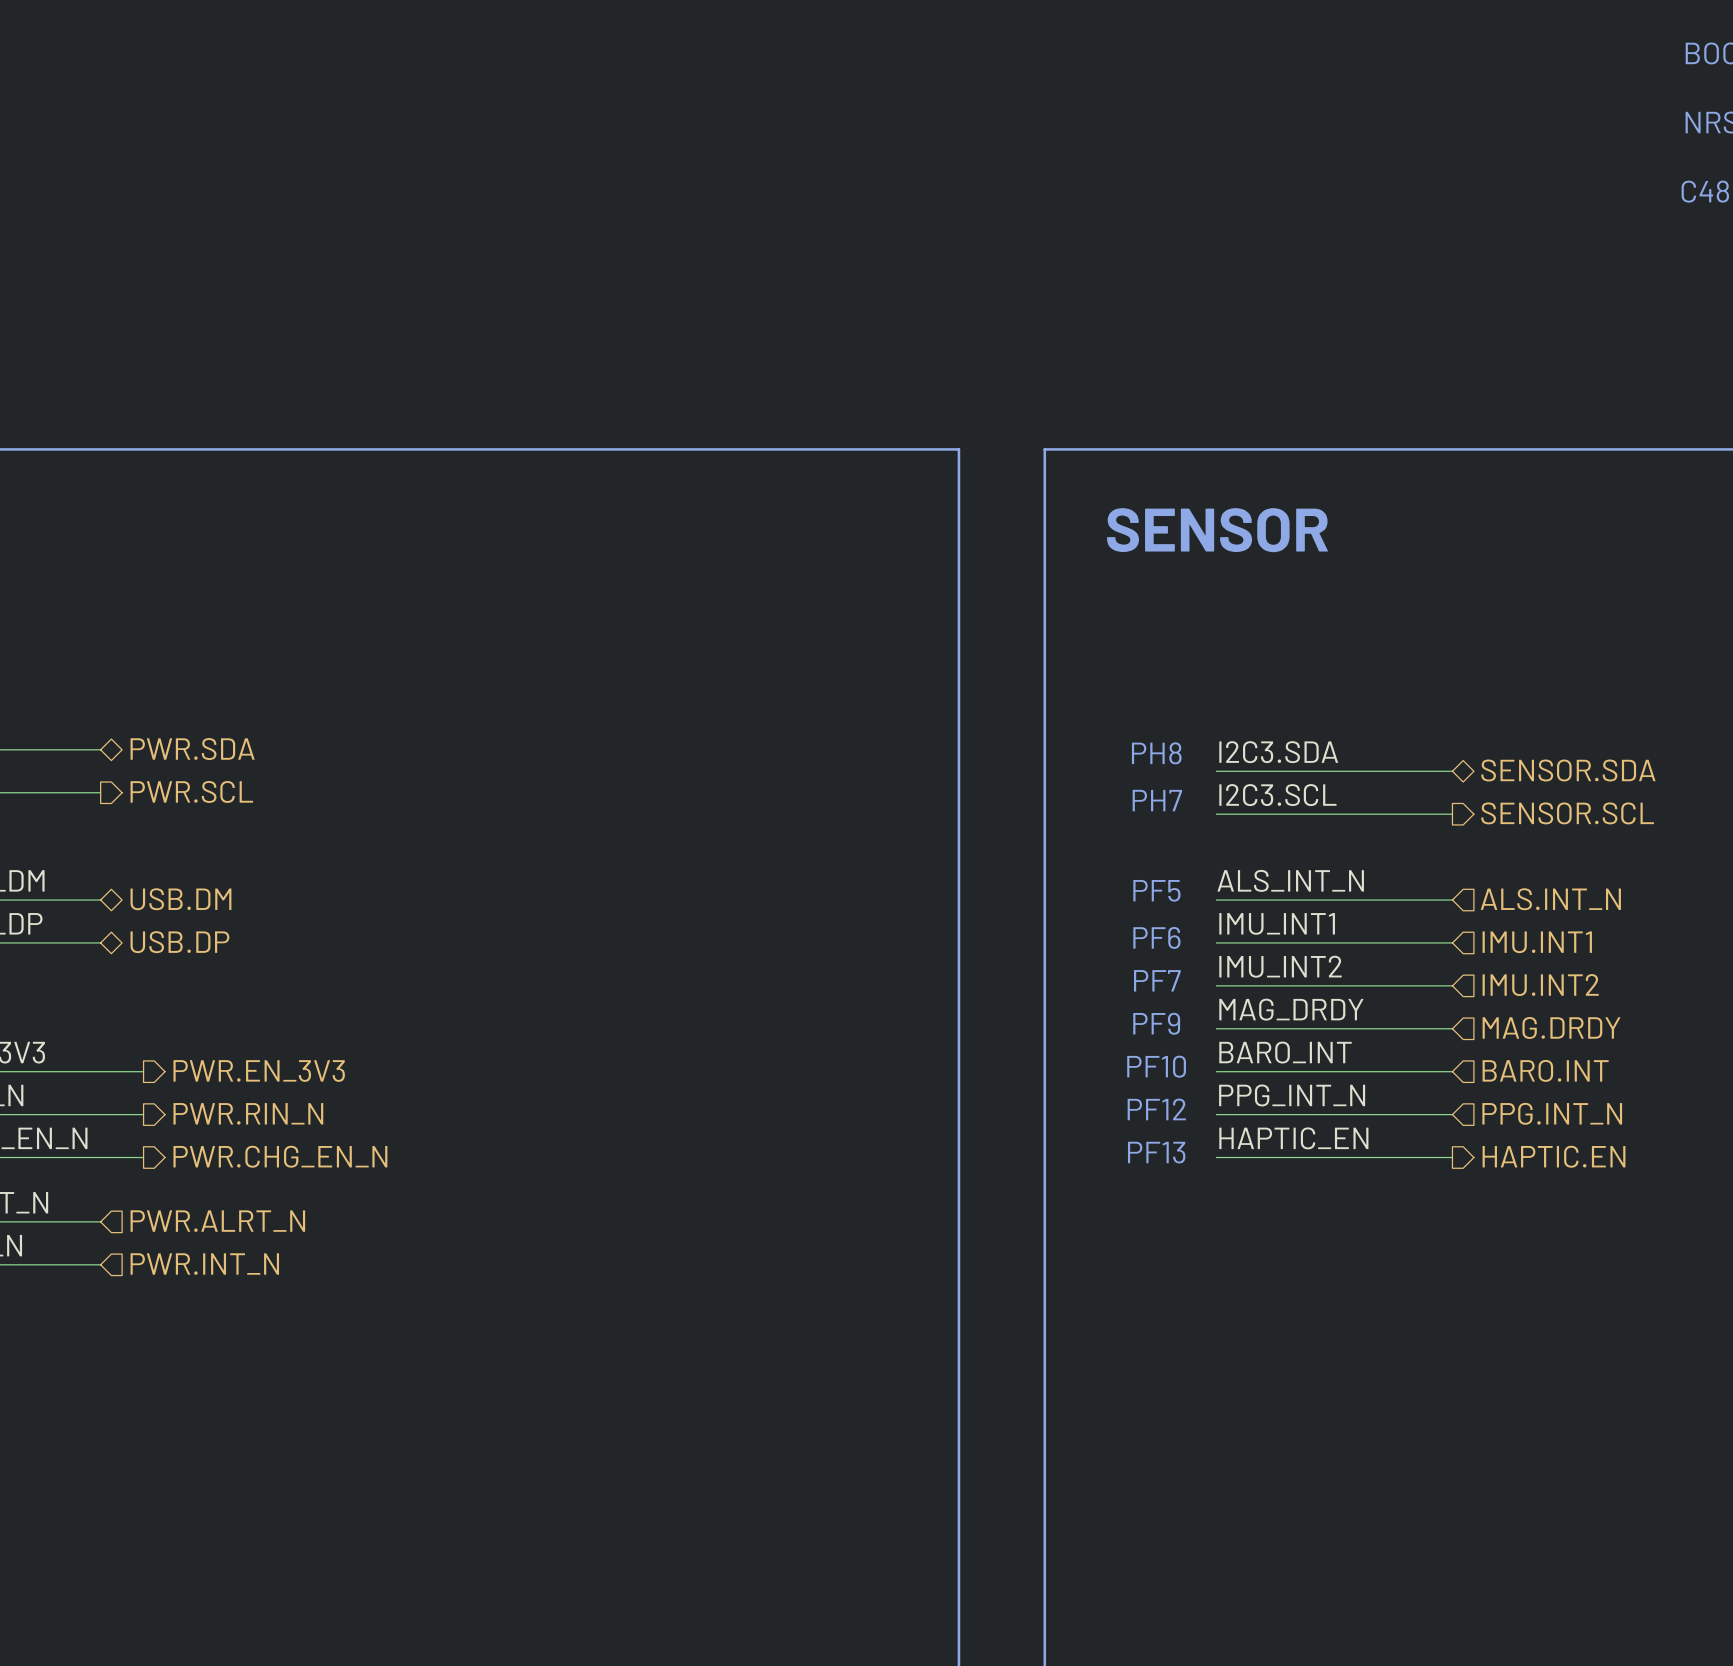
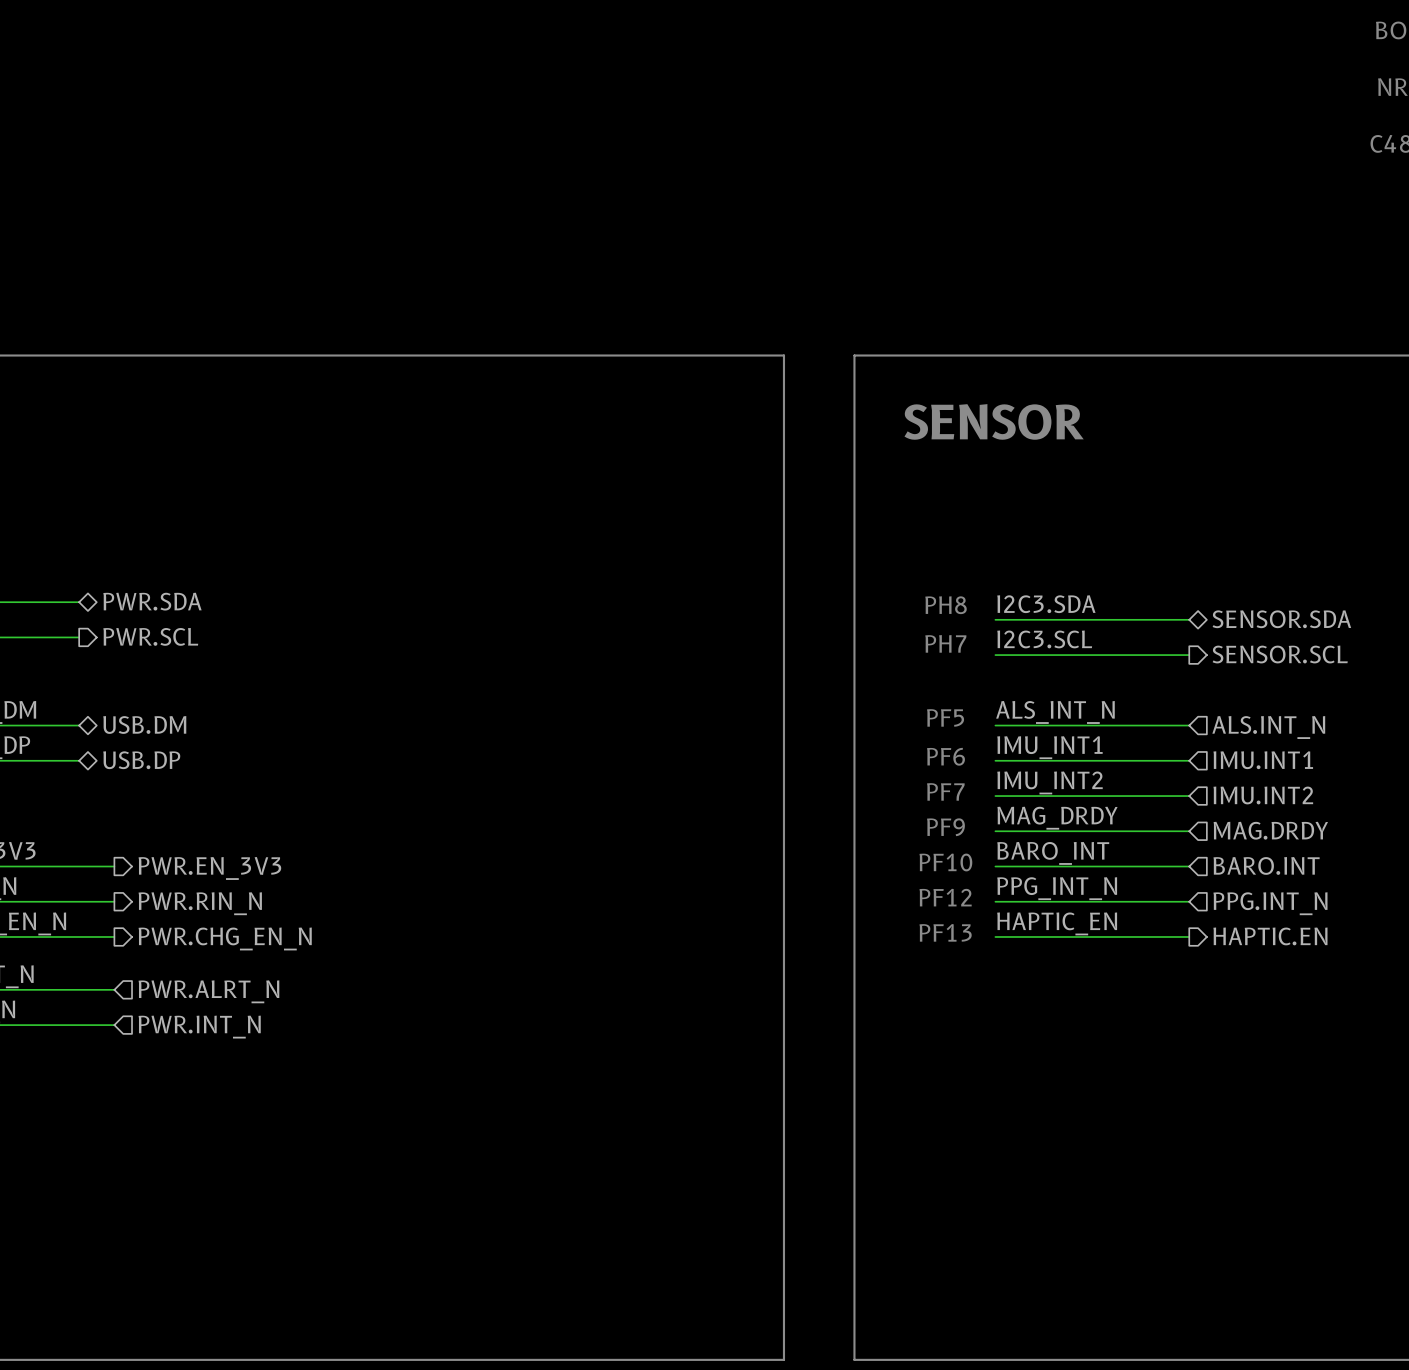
wire: none -> (79, 989) (114, 989)
hierarchical label position: PWR.ALRT_N (217, 1221) -> PWR.ALRT_N (208, 991)
wire: none -> (79, 1025) (114, 1025)
hierarchical label position: PWR.INT_N (204, 1264) -> PWR.INT_N (199, 1027)

